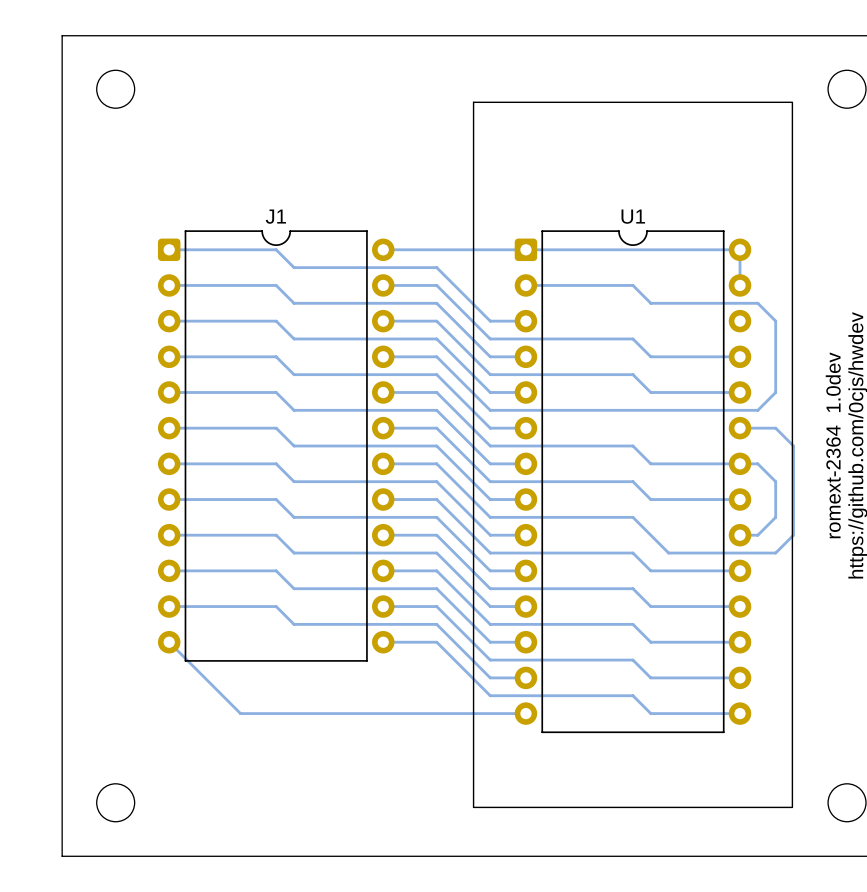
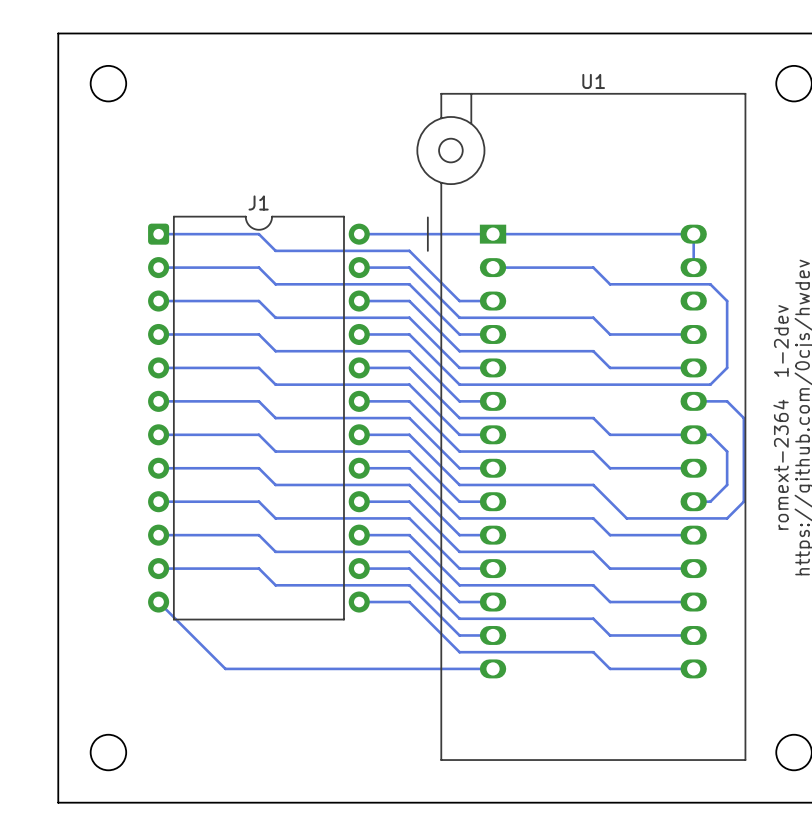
U1 footprint: [472, 101, 794, 809] -> [416, 93, 747, 761]
U1 name position: U1 (633, 216) -> U1 (593, 81)
text: romext-2364 1.0dev (833, 445) -> romext-2364 1-2dev (781, 417)

